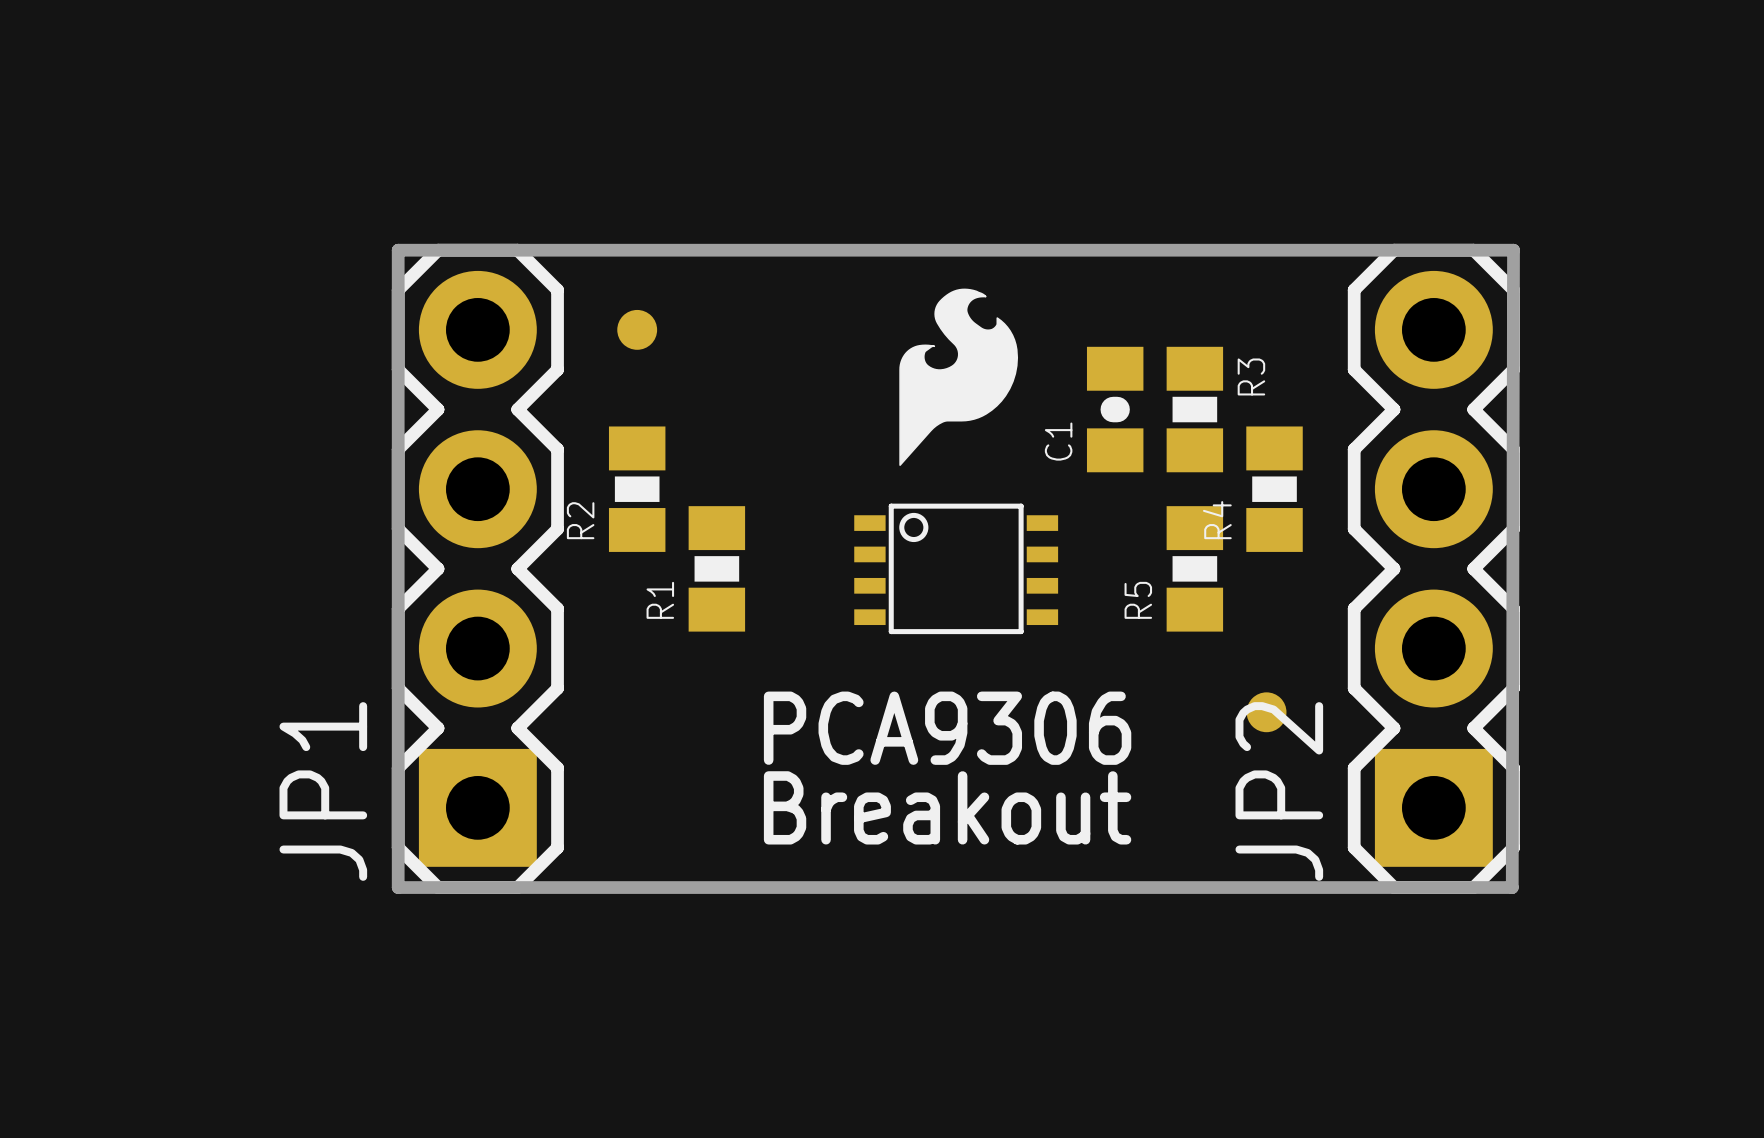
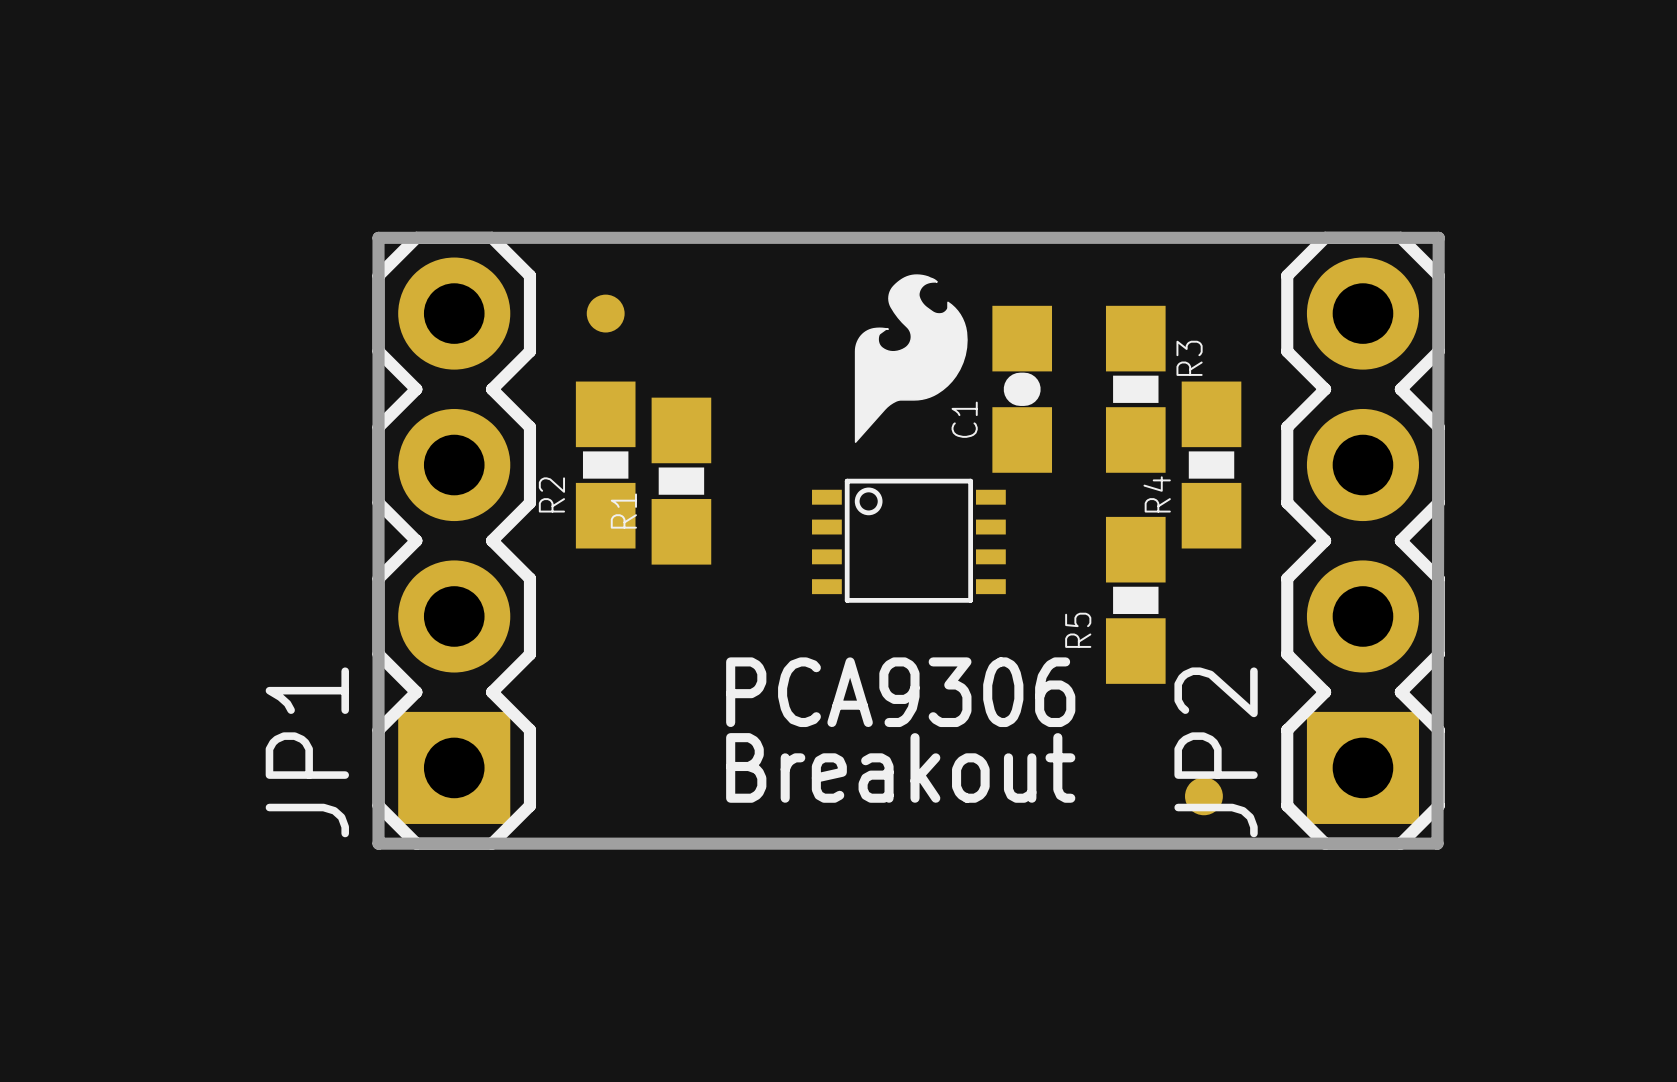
C1 footprint: [1086, 346, 1144, 473] -> [992, 305, 1053, 473]
R3 footprint: [1166, 346, 1224, 473] -> [1105, 305, 1166, 473]
R2 footprint: [608, 426, 666, 552] -> [575, 381, 636, 549]
R4 footprint: [1246, 426, 1303, 552] -> [1181, 381, 1242, 549]
C1 name position: C1 (1058, 441) -> C1 (964, 419)
R1 footprint: [688, 506, 746, 632] -> [651, 397, 712, 565]
R5 footprint: [1166, 506, 1224, 632] -> [1105, 516, 1166, 684]
part position: (1266, 712) -> (1203, 796)

